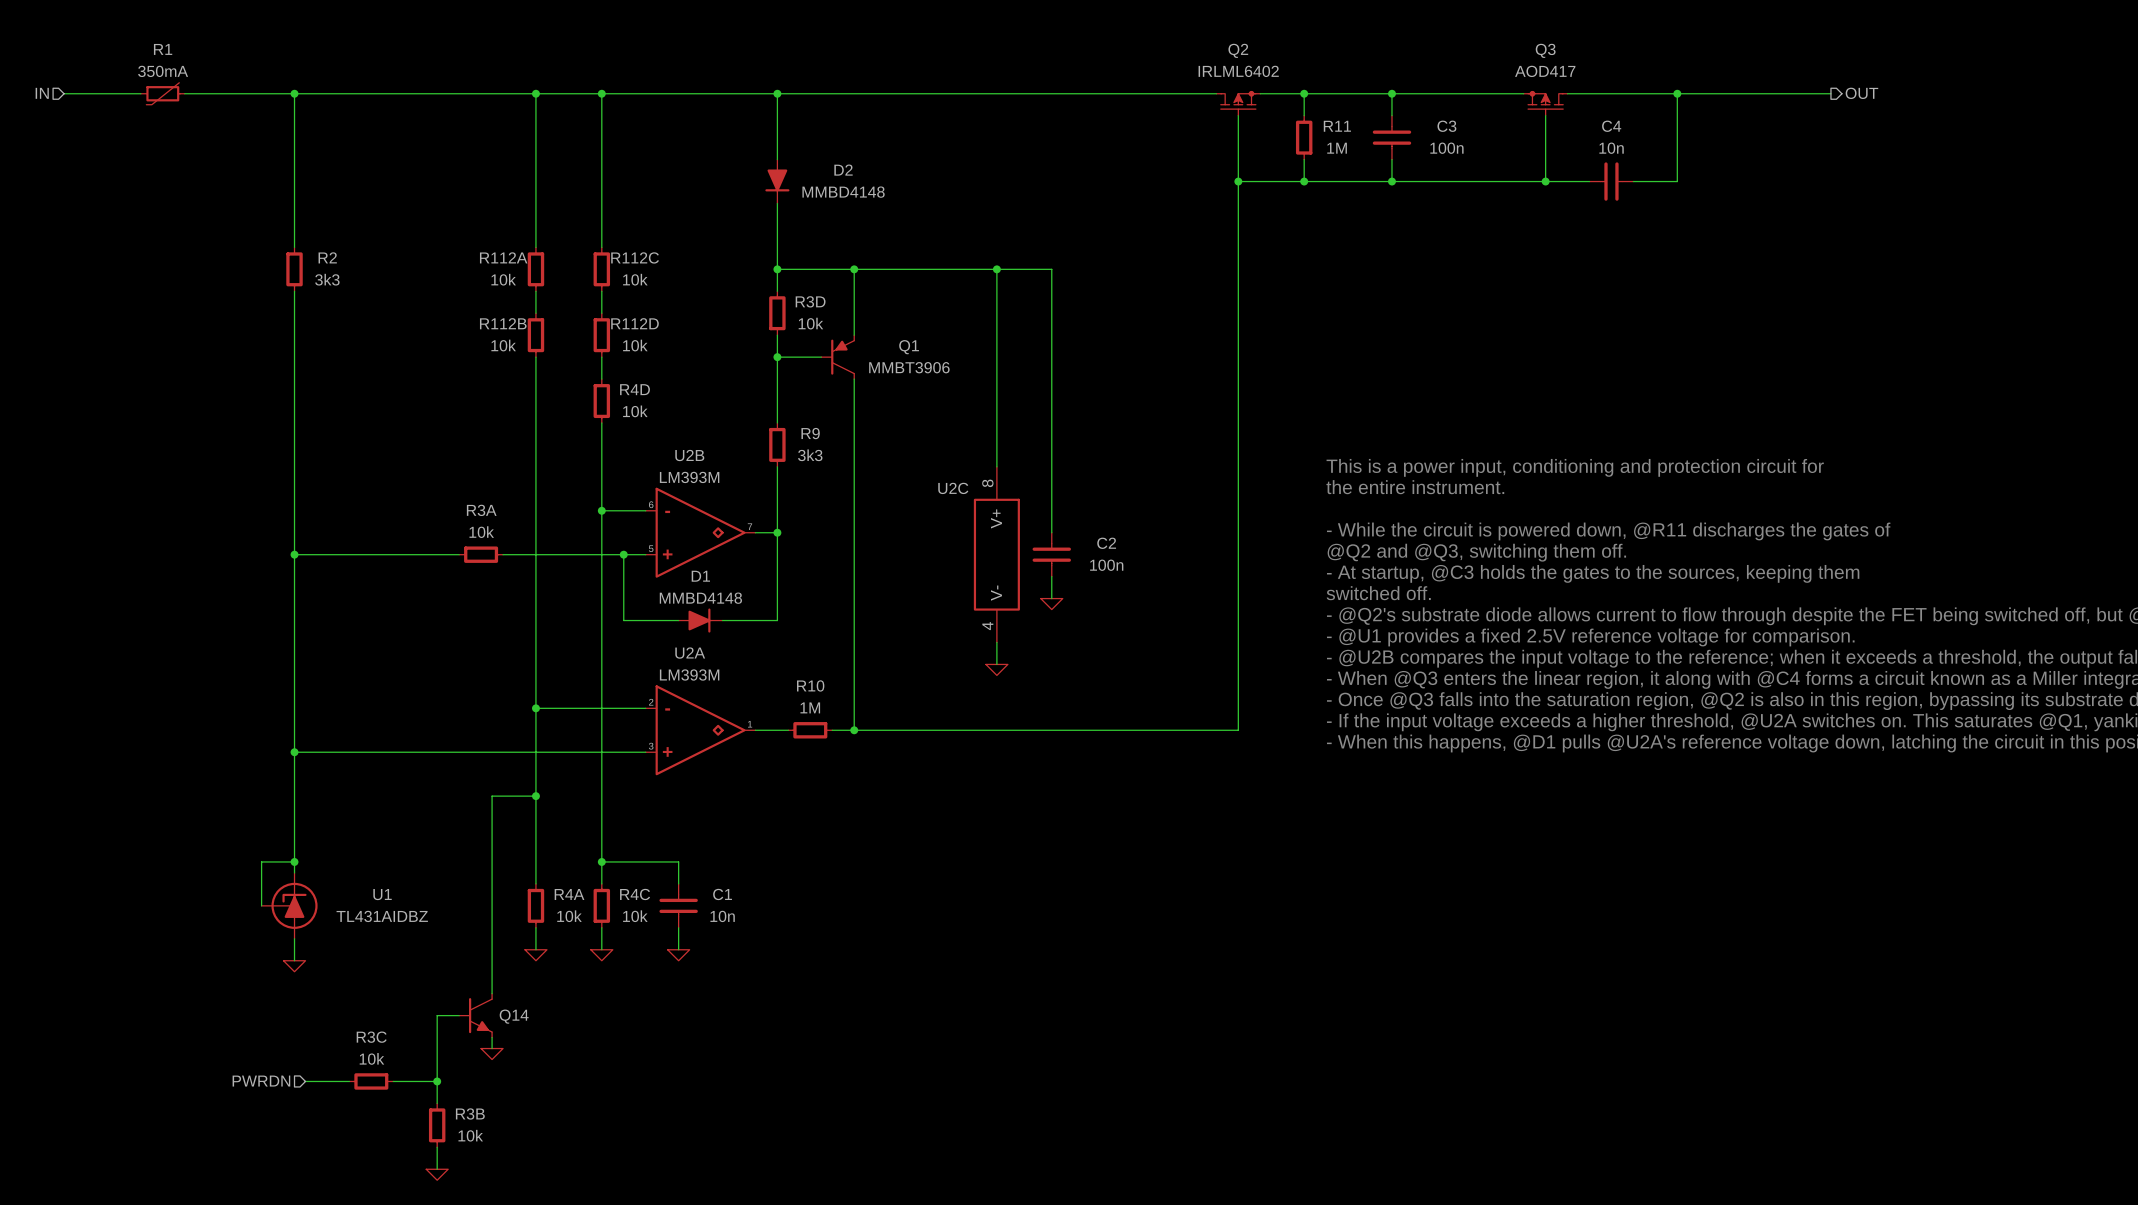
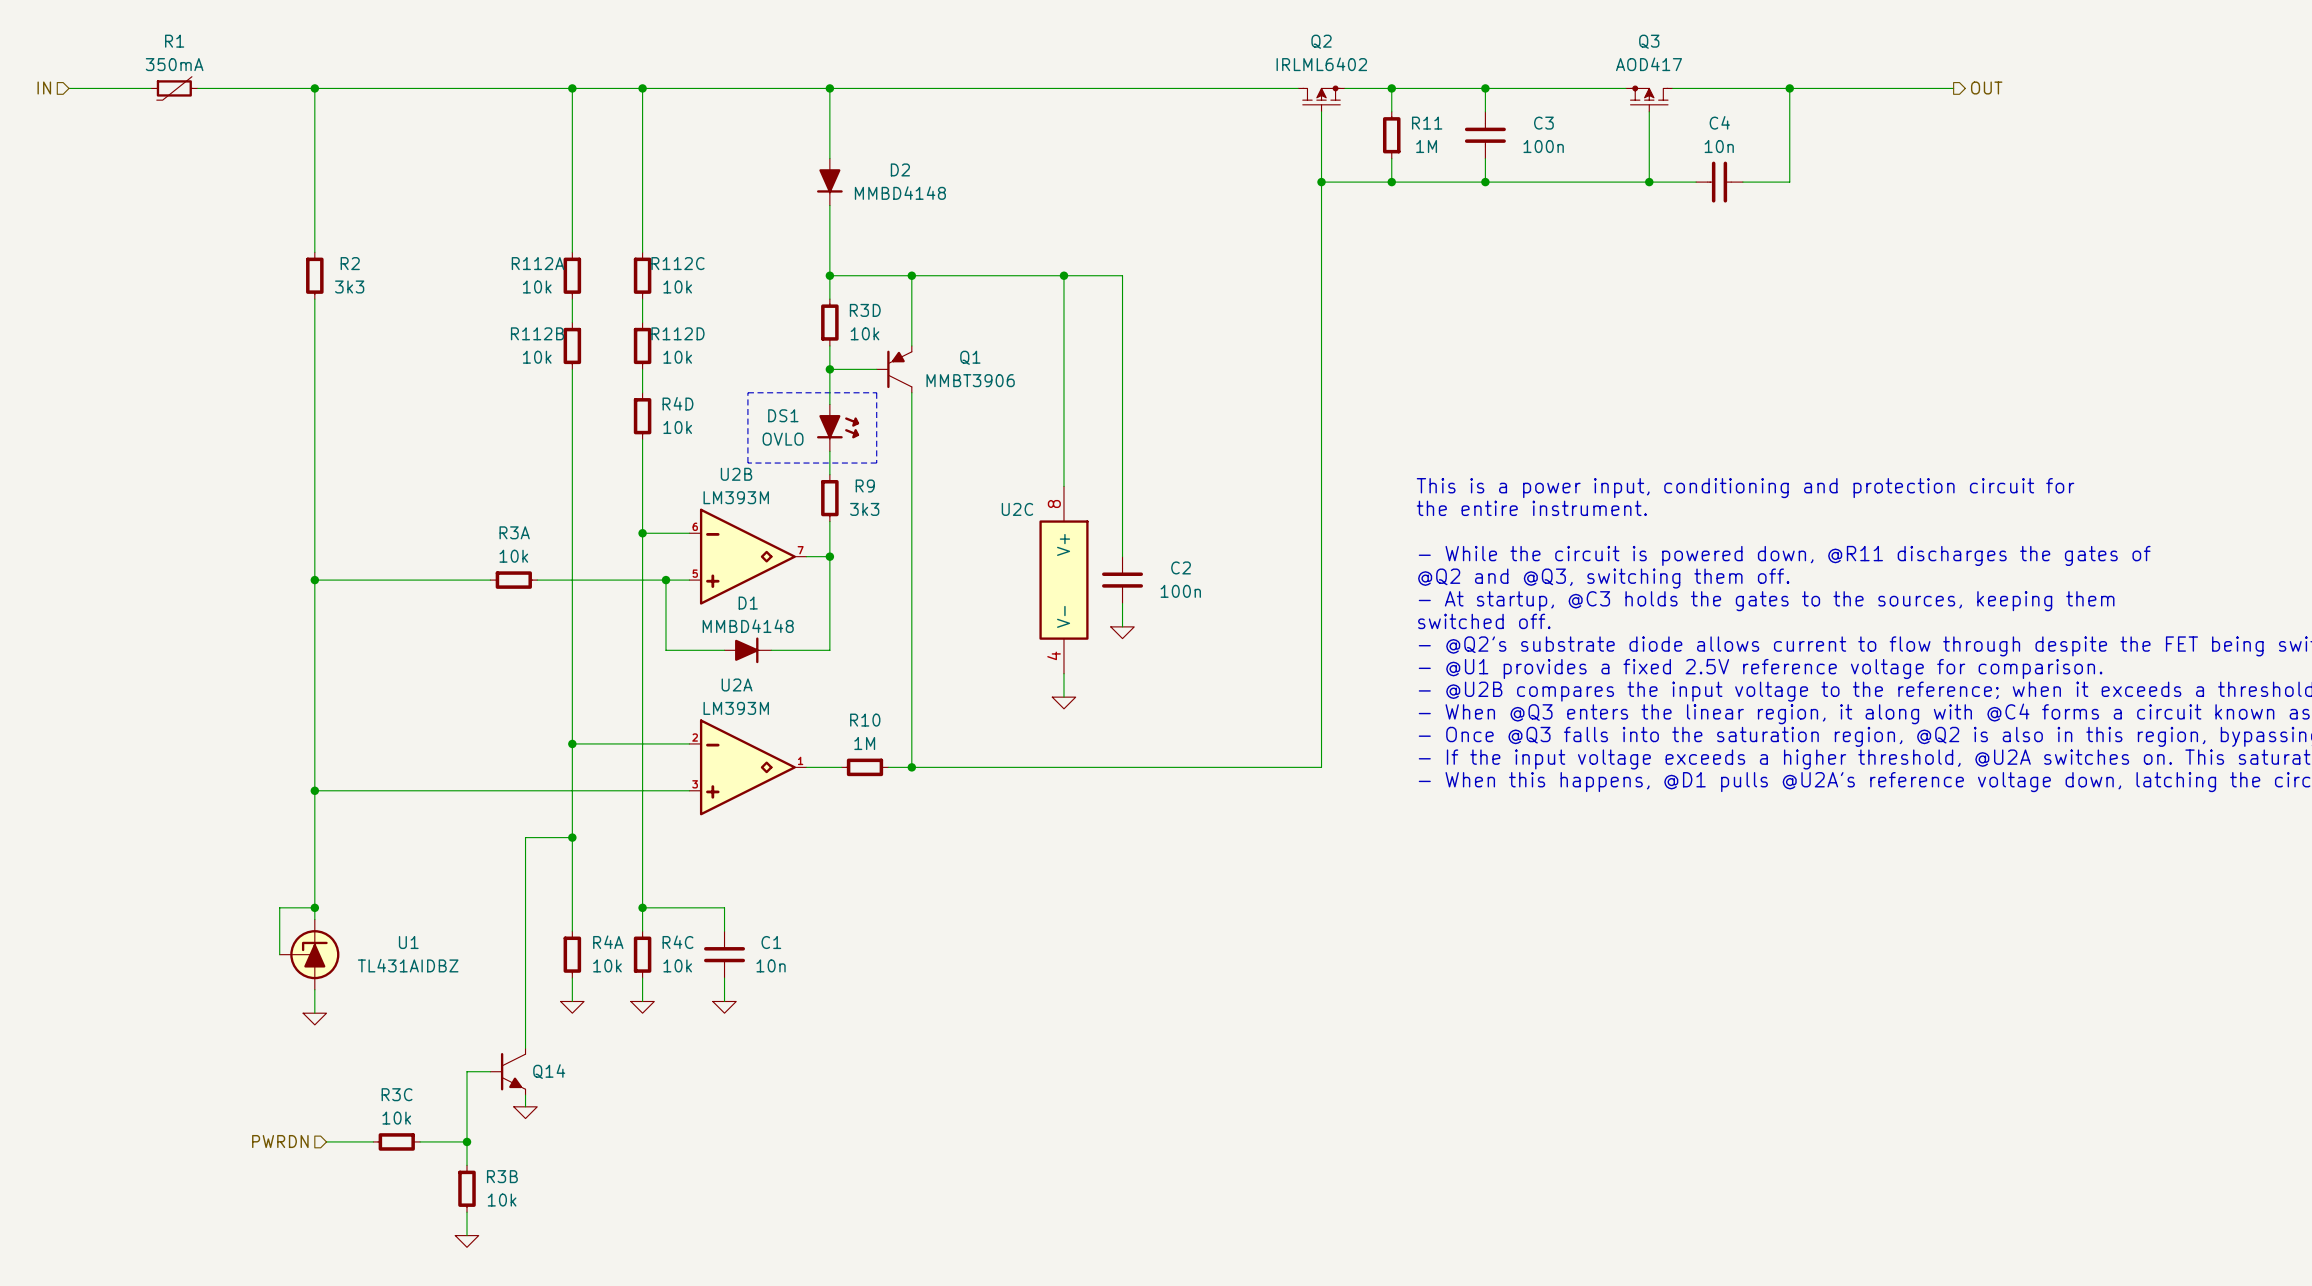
line: none -> (747, 392) (876, 392) (876, 463) (747, 463) (747, 392)
DS1: none -> OVLO (838, 427)
wire: none -> (829, 451) (829, 474)
R9 position: (777, 444) -> (829, 498)
wire: (777, 466) (777, 499) -> none

